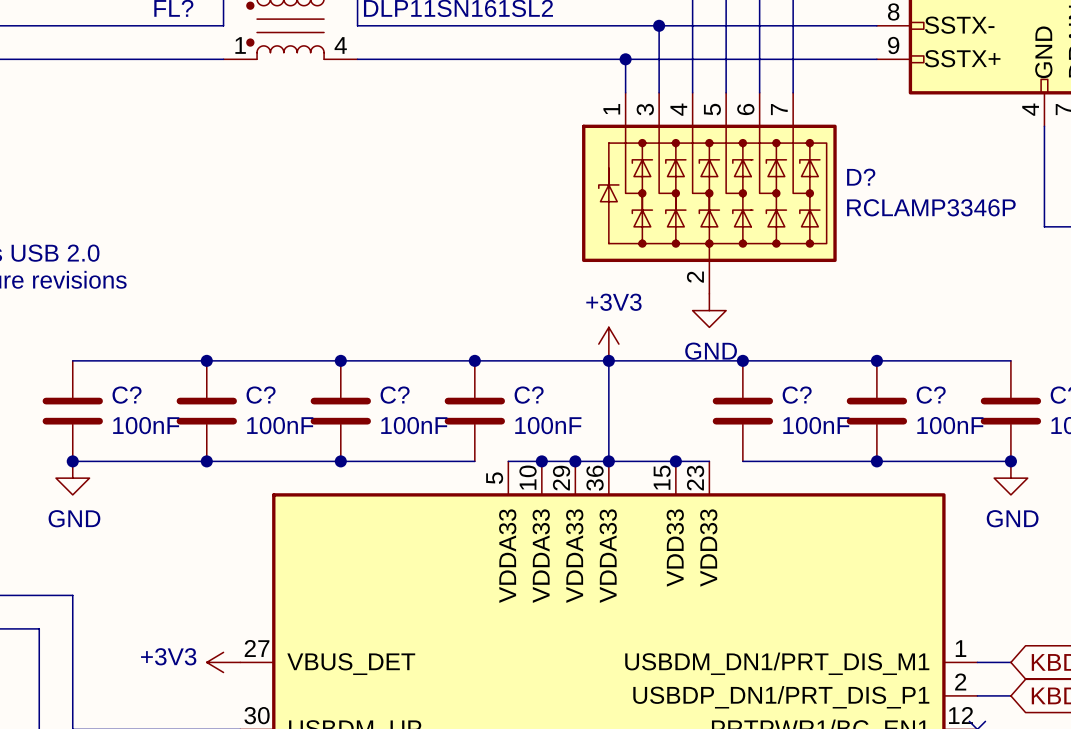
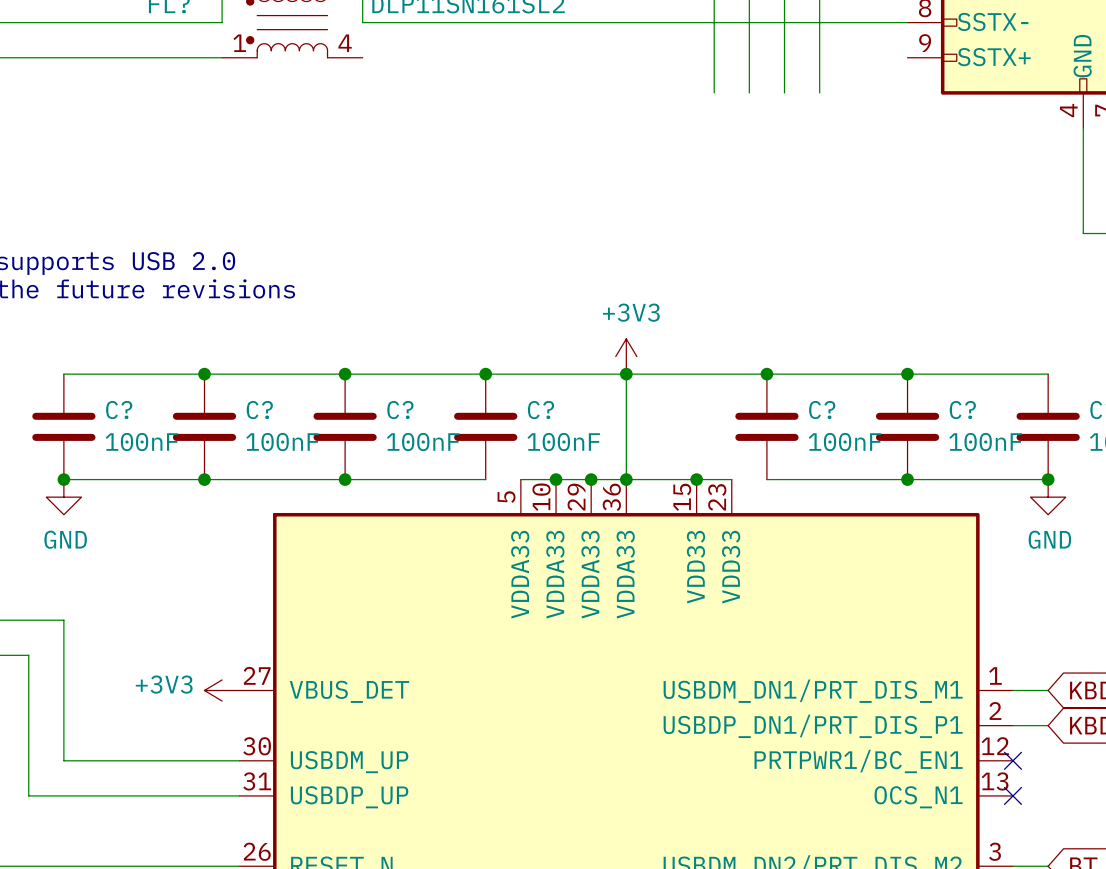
wire: (659, 25) (659, 92) -> none
junction: (659, 25) -> none
wire: (357, 59) (876, 59) -> none
wire: (625, 59) (625, 92) -> none
junction: (625, 59) -> none
D?: RCLAMP3346P (709, 193) -> none
power symbol: GND (709, 310) -> none

